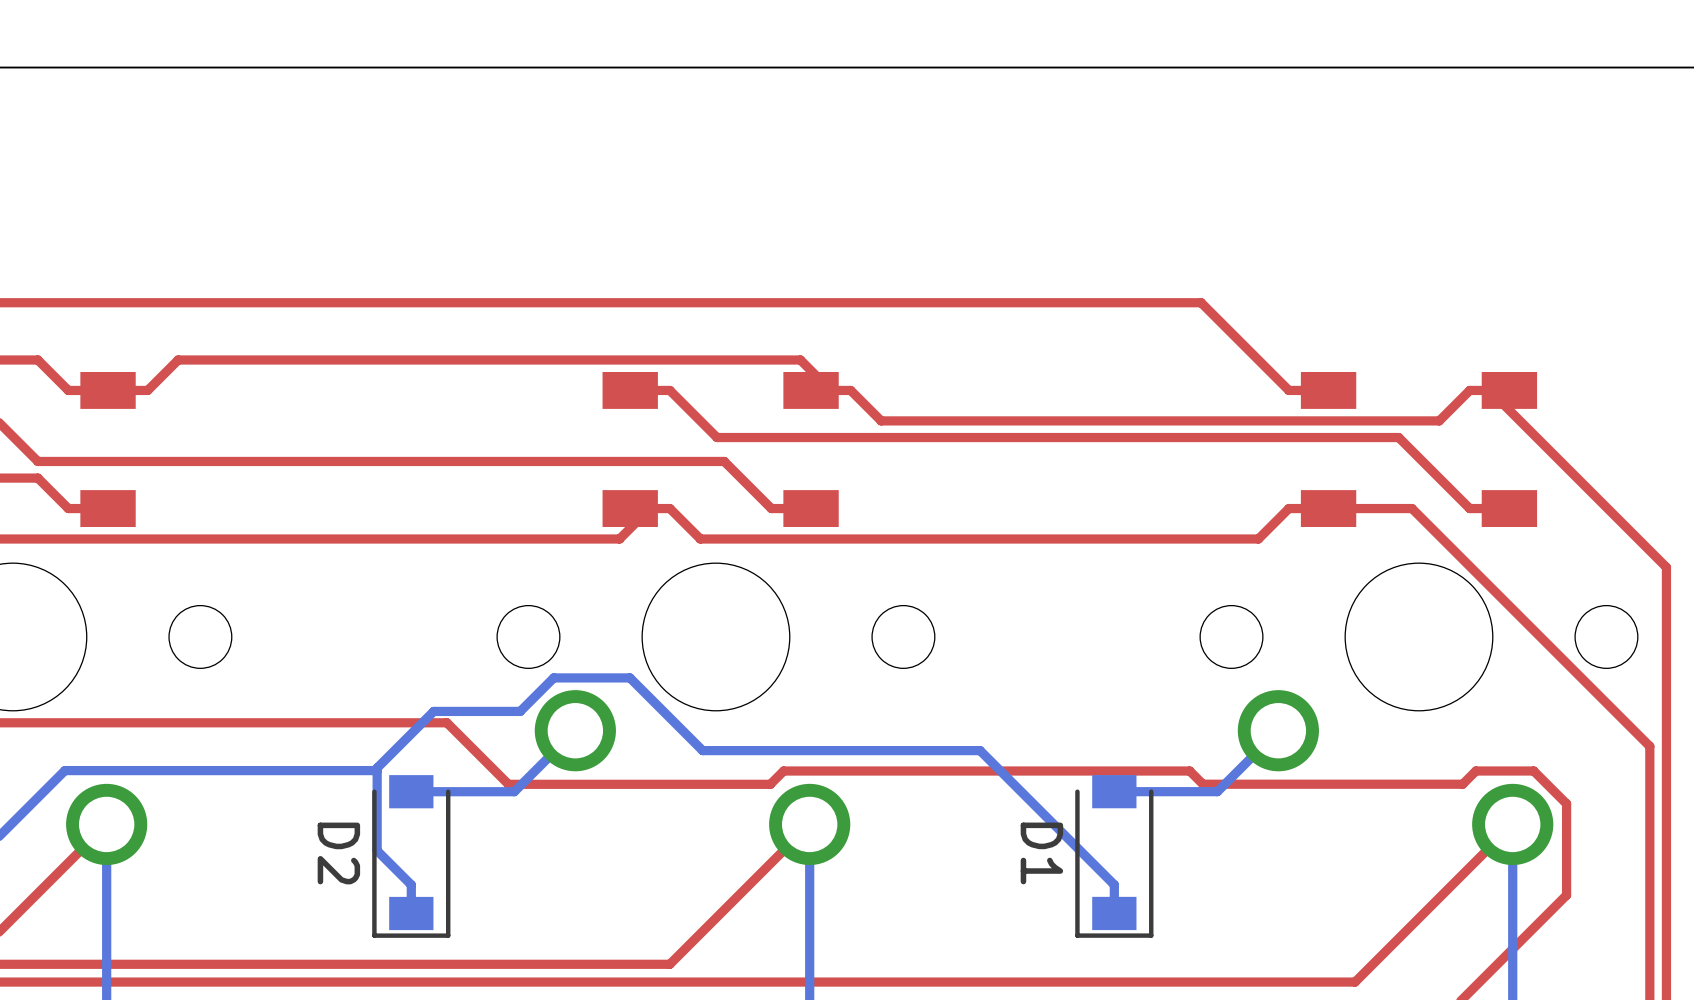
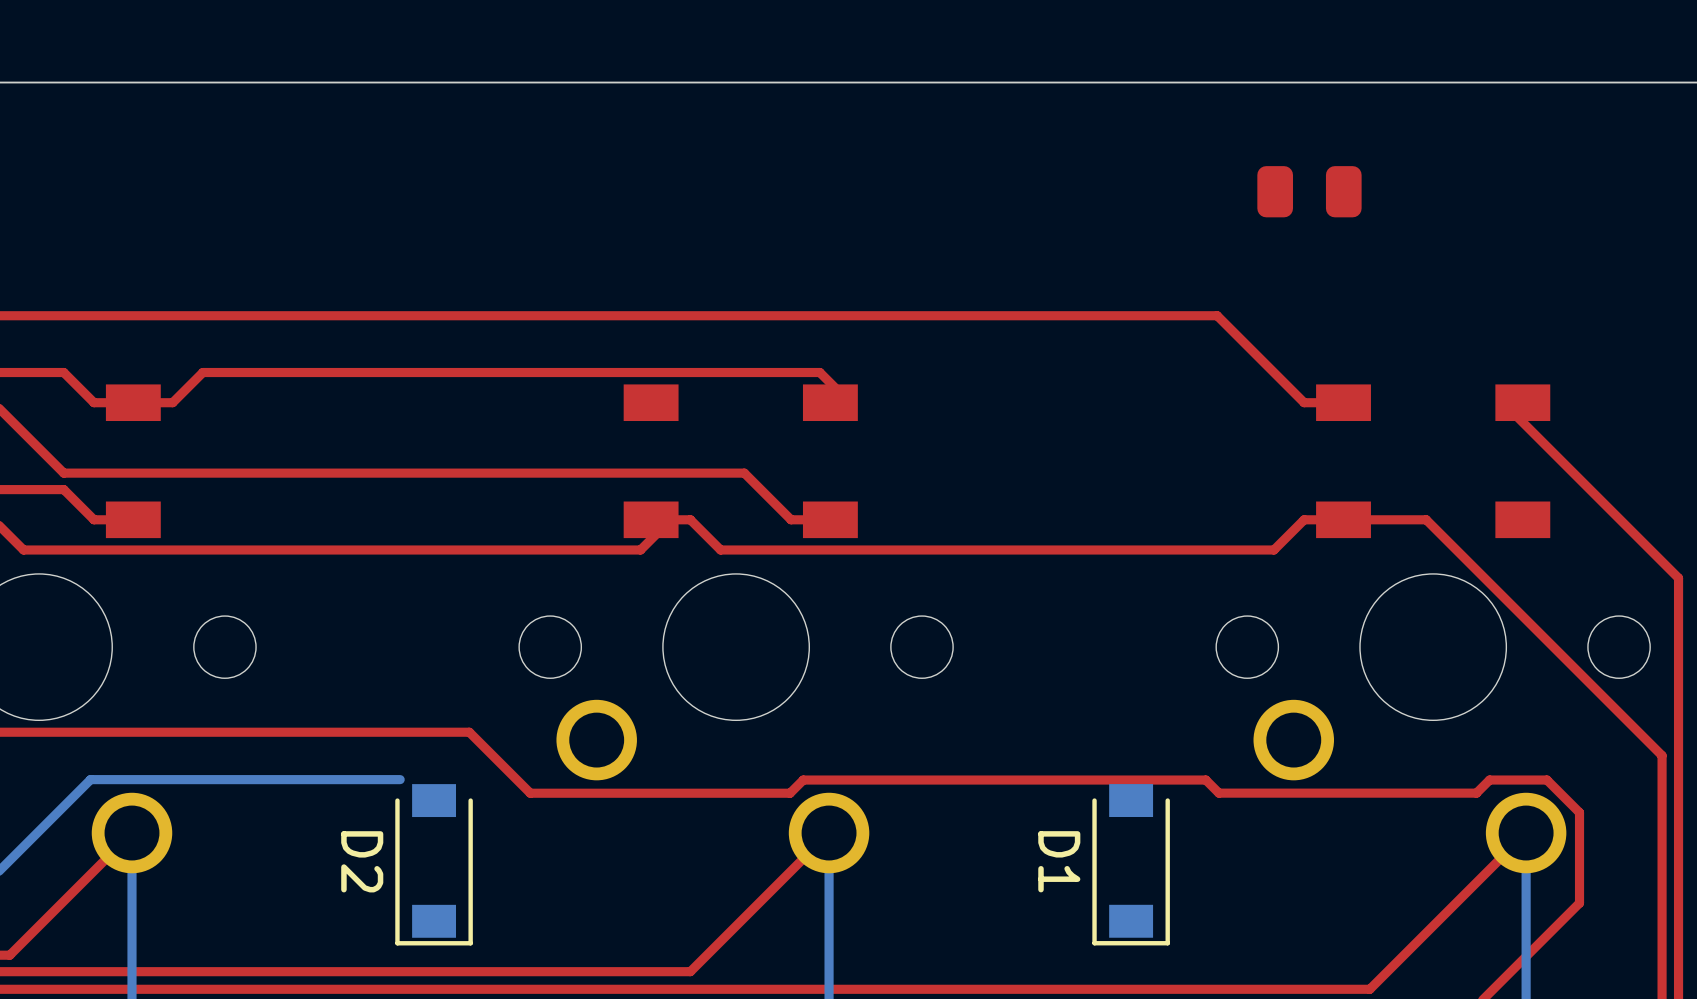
part: none -> (1309, 191)
top track: (630, 390) (669, 390) (716, 437) (1398, 437) (1469, 508) (1509, 508) -> none
top track: (1509, 390) (1469, 390) (1439, 420) (881, 420) (850, 390) (811, 390) -> none
bottom track: (575, 730) (514, 791) (411, 791) -> none
bottom track: (1278, 730) (1217, 791) (1114, 791) -> none
bottom track: (1114, 913) (1114, 884) (980, 750) (702, 750) (629, 677) (553, 677) (520, 711) (433, 711) (377, 768) (377, 850) (411, 884) (411, 913) -> none

